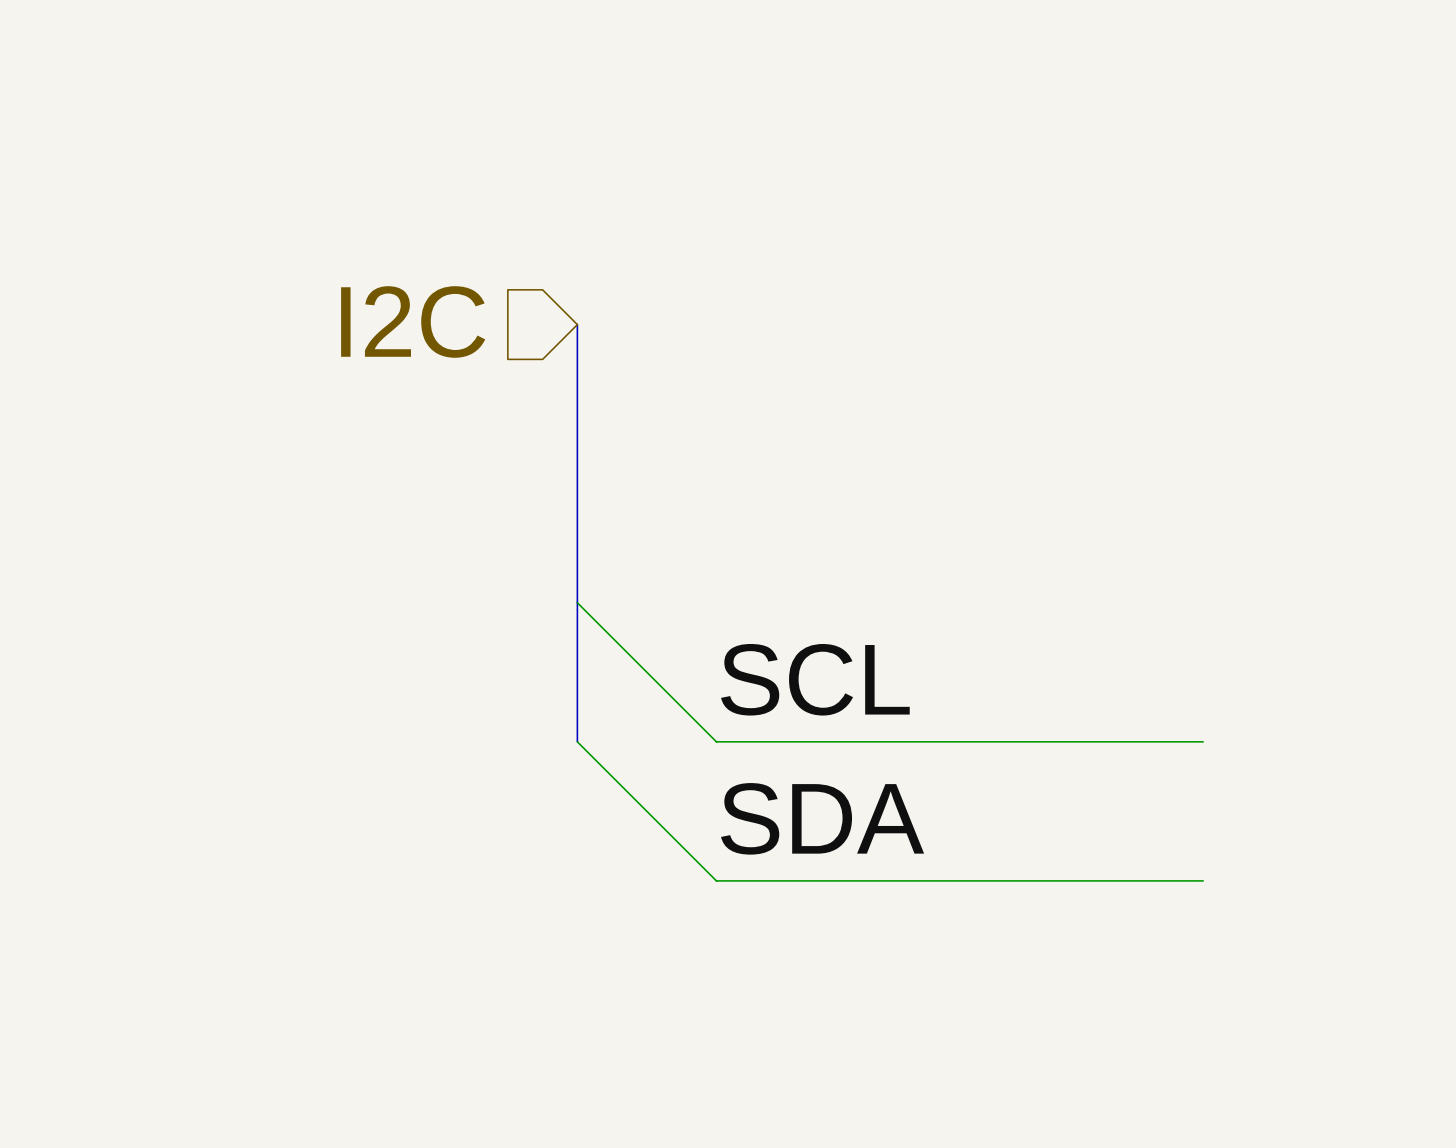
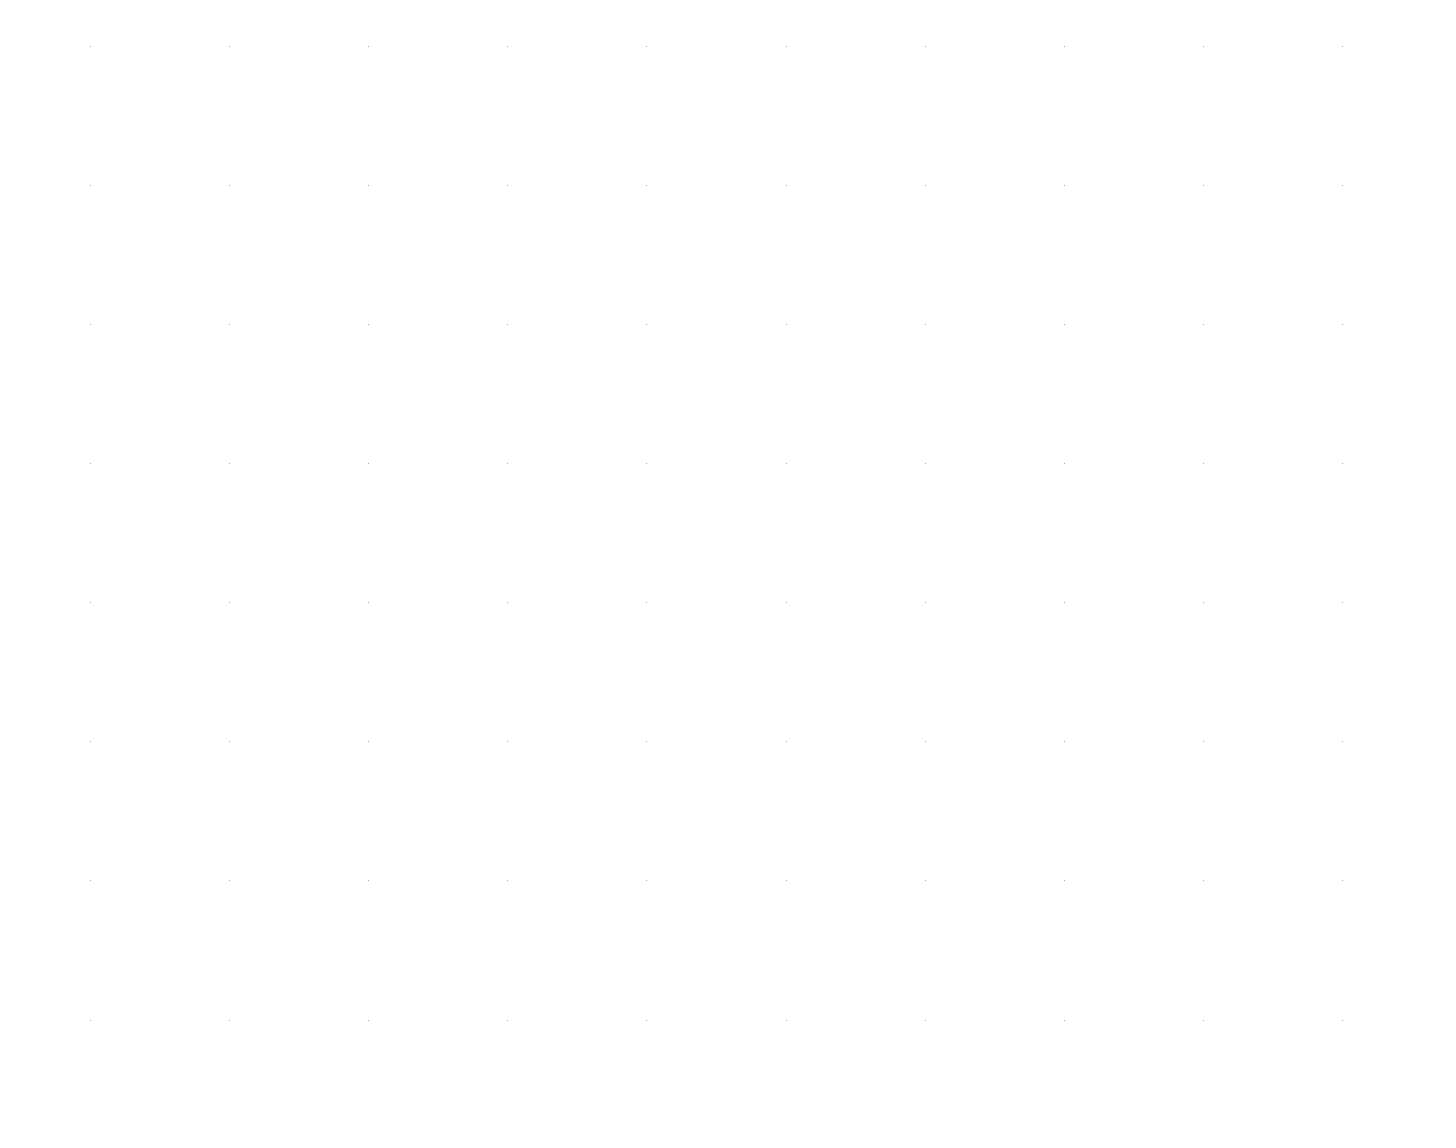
hierarchical label: I2C (413, 321) -> none
bus: (577, 324) (577, 741) -> none
wire: (577, 602) (716, 741) (1203, 741) -> none
label: SCL (815, 679) -> none
wire: (577, 741) (716, 880) (1203, 880) -> none
label: SDA (822, 818) -> none

